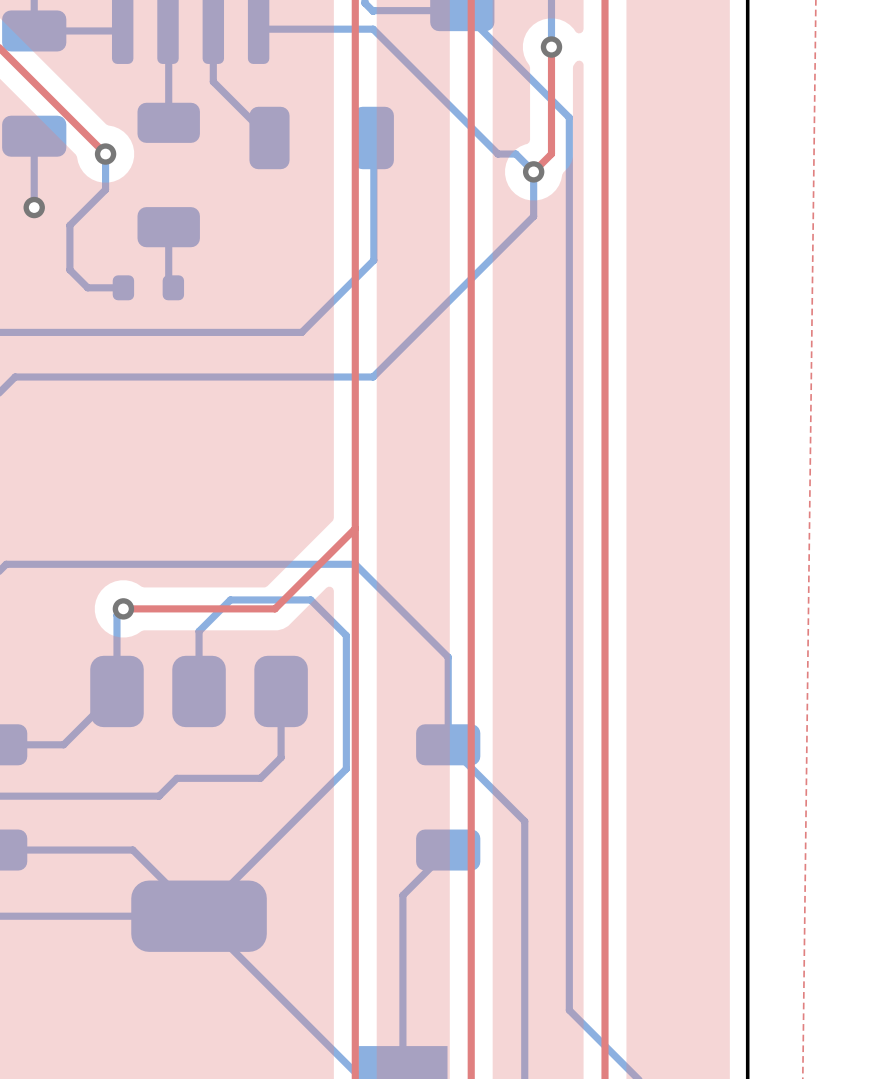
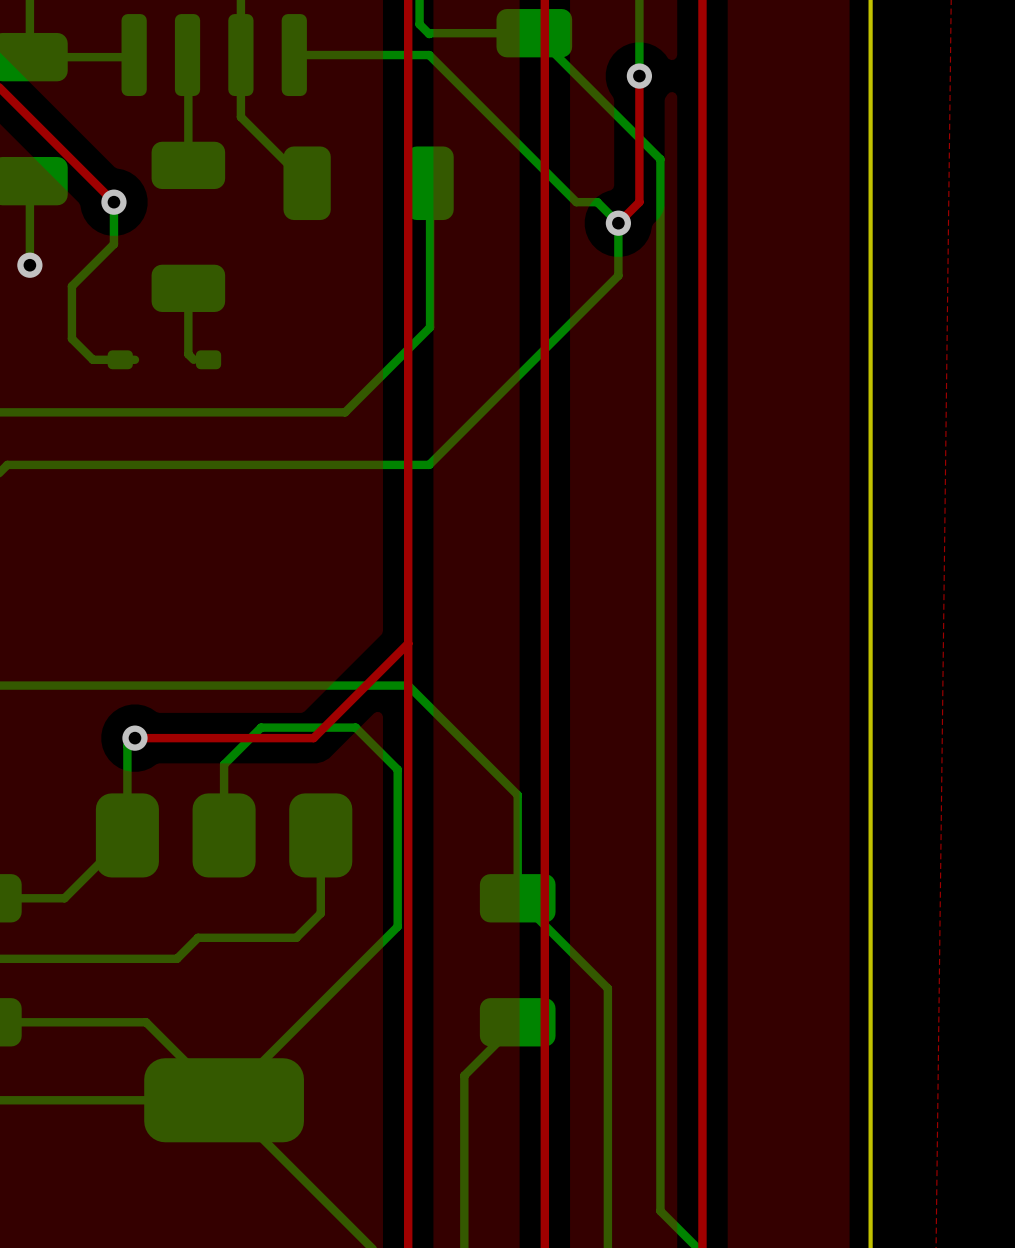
part footprint: [112, 275, 185, 301] -> [107, 350, 222, 370]

